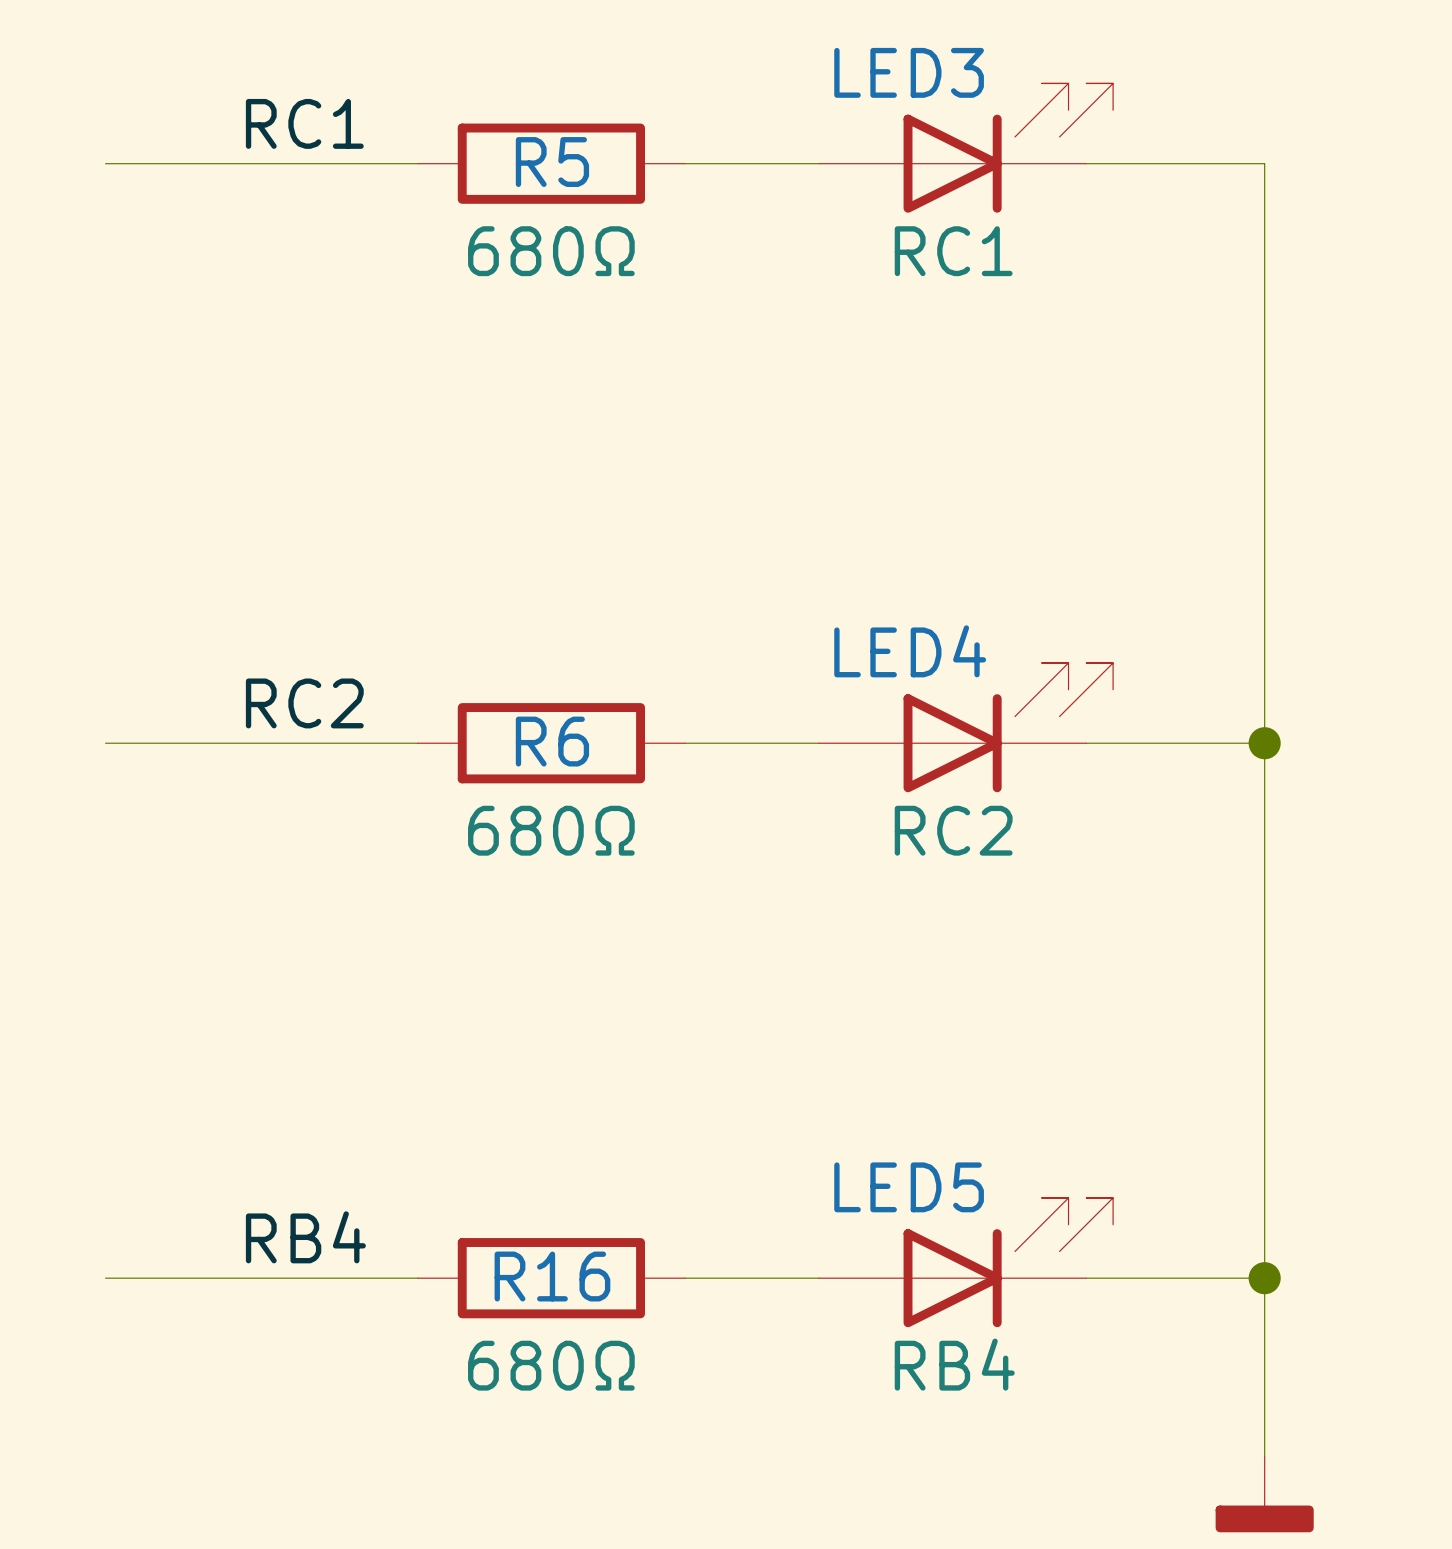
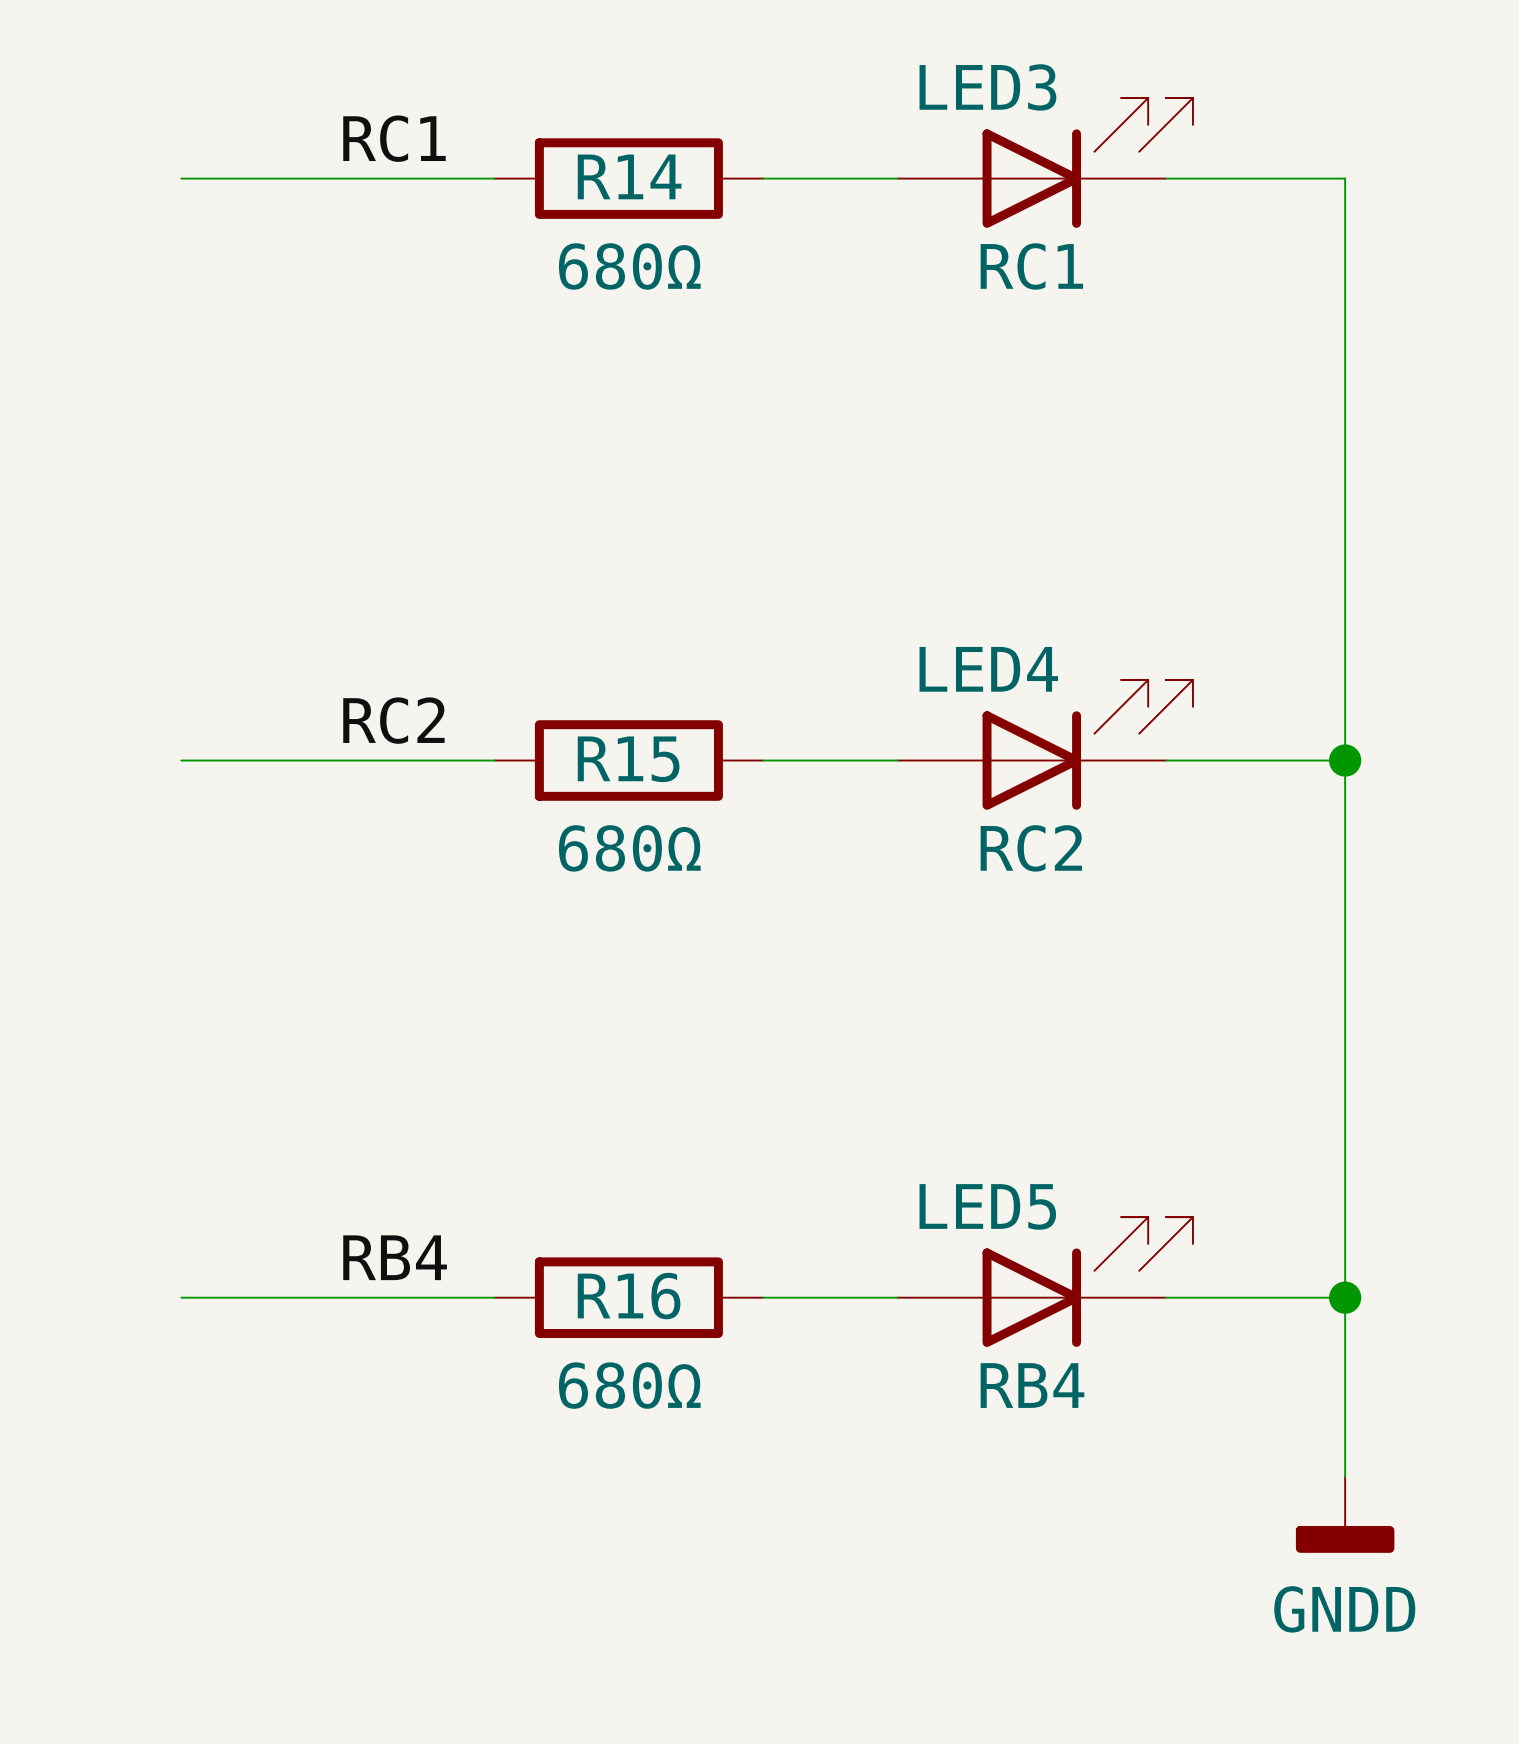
R5 name: R5 (552, 162) -> R14 (629, 176)
R6 name: R6 (552, 741) -> R15 (628, 759)

